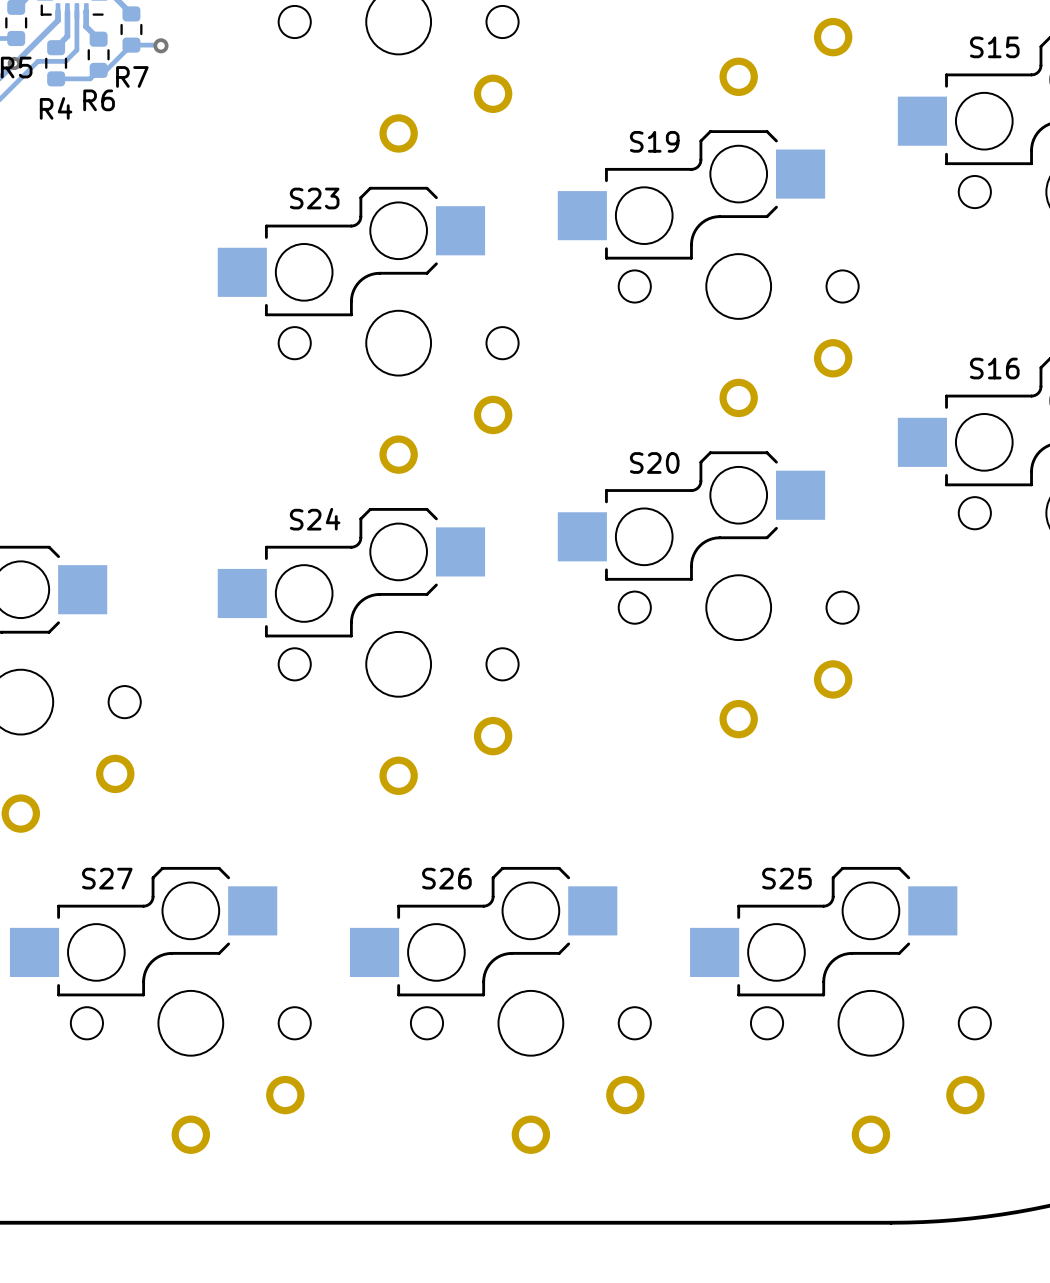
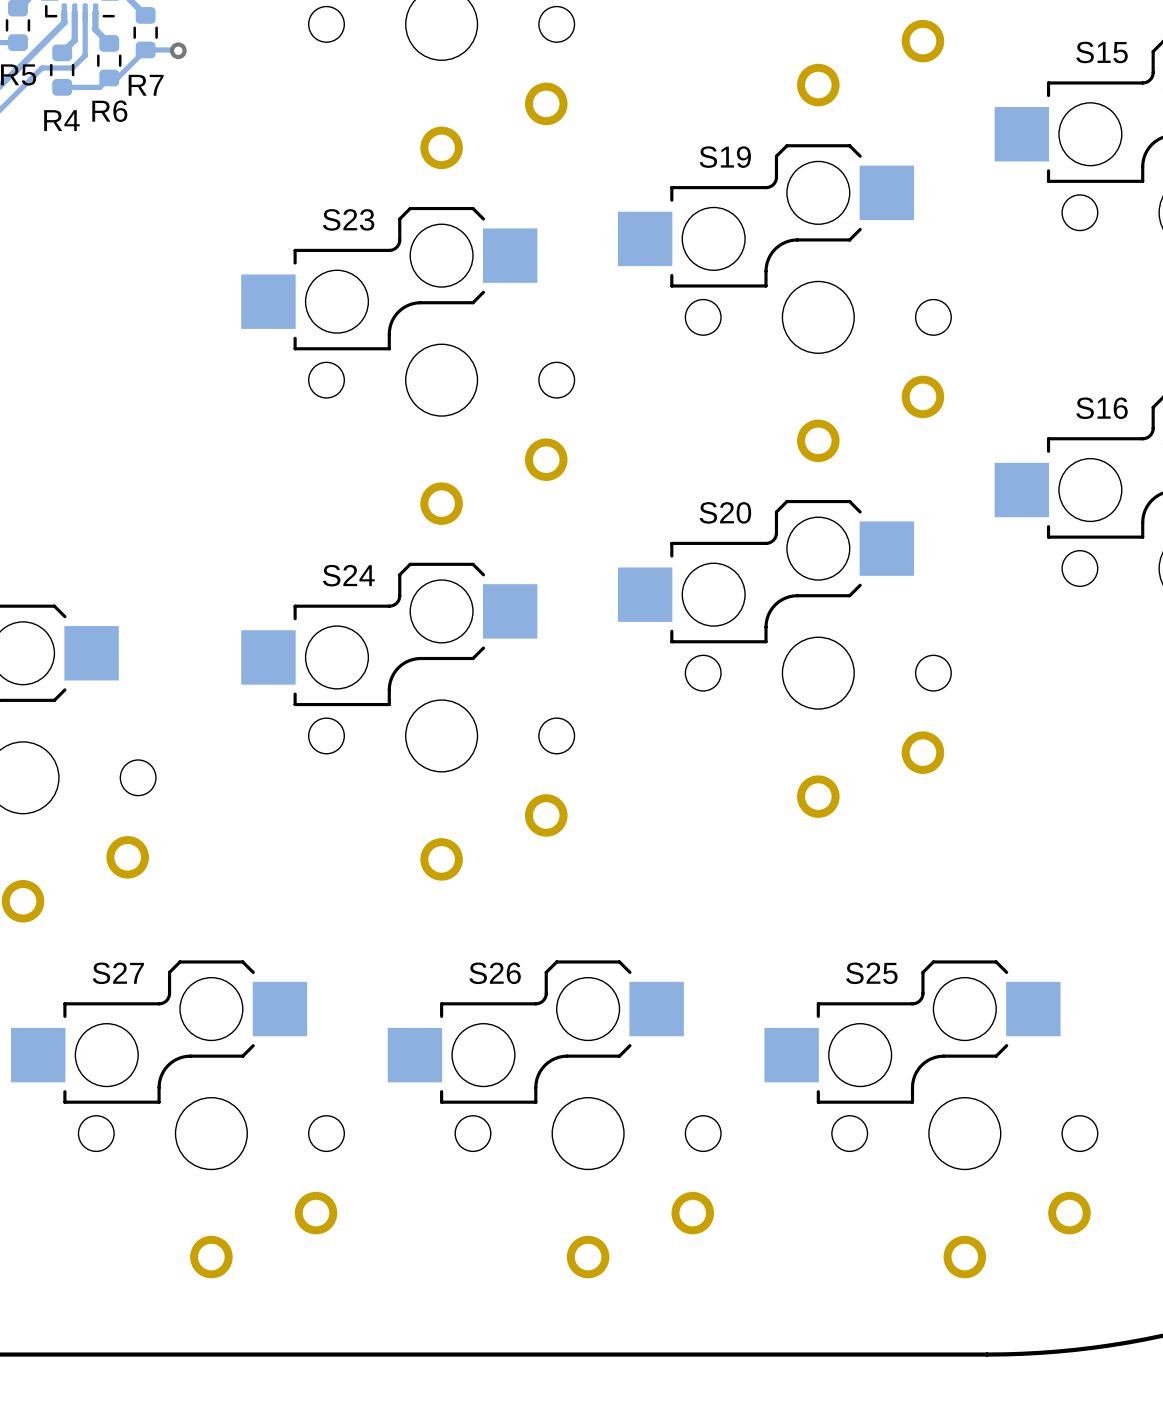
via: (14, 63) -> none

